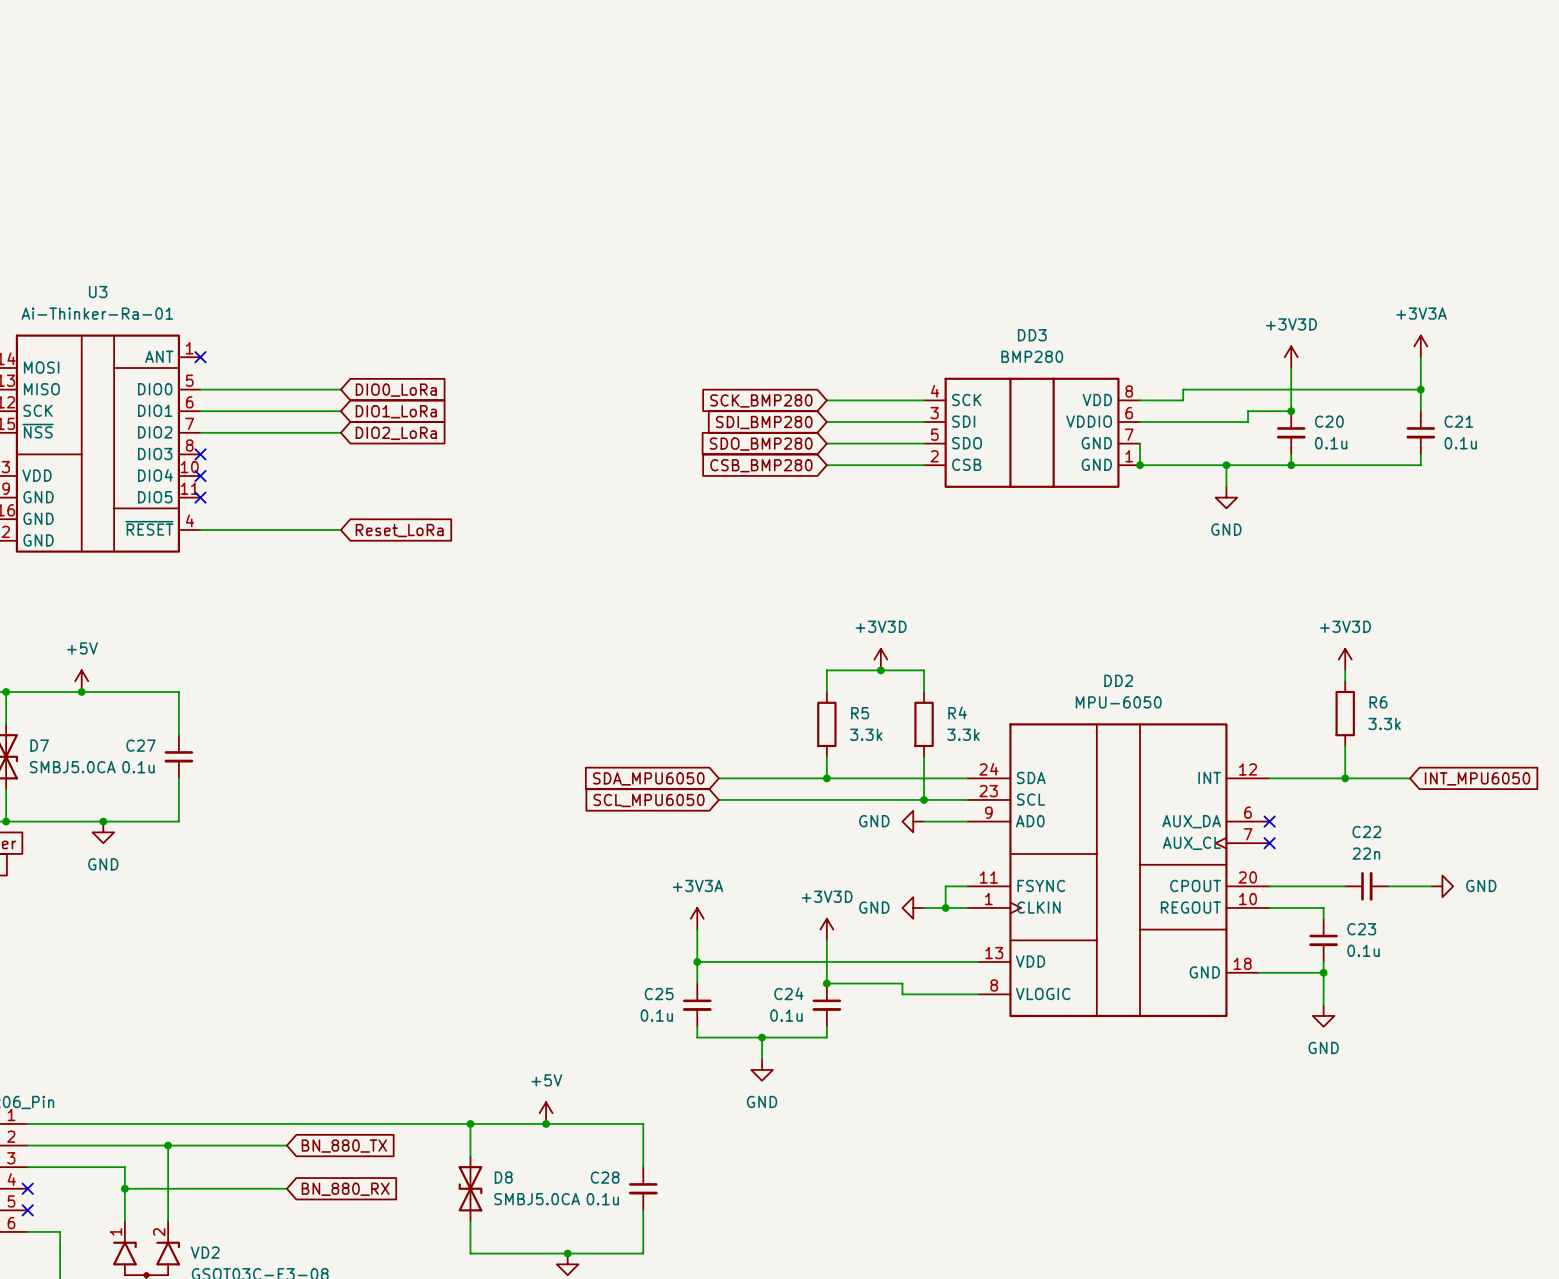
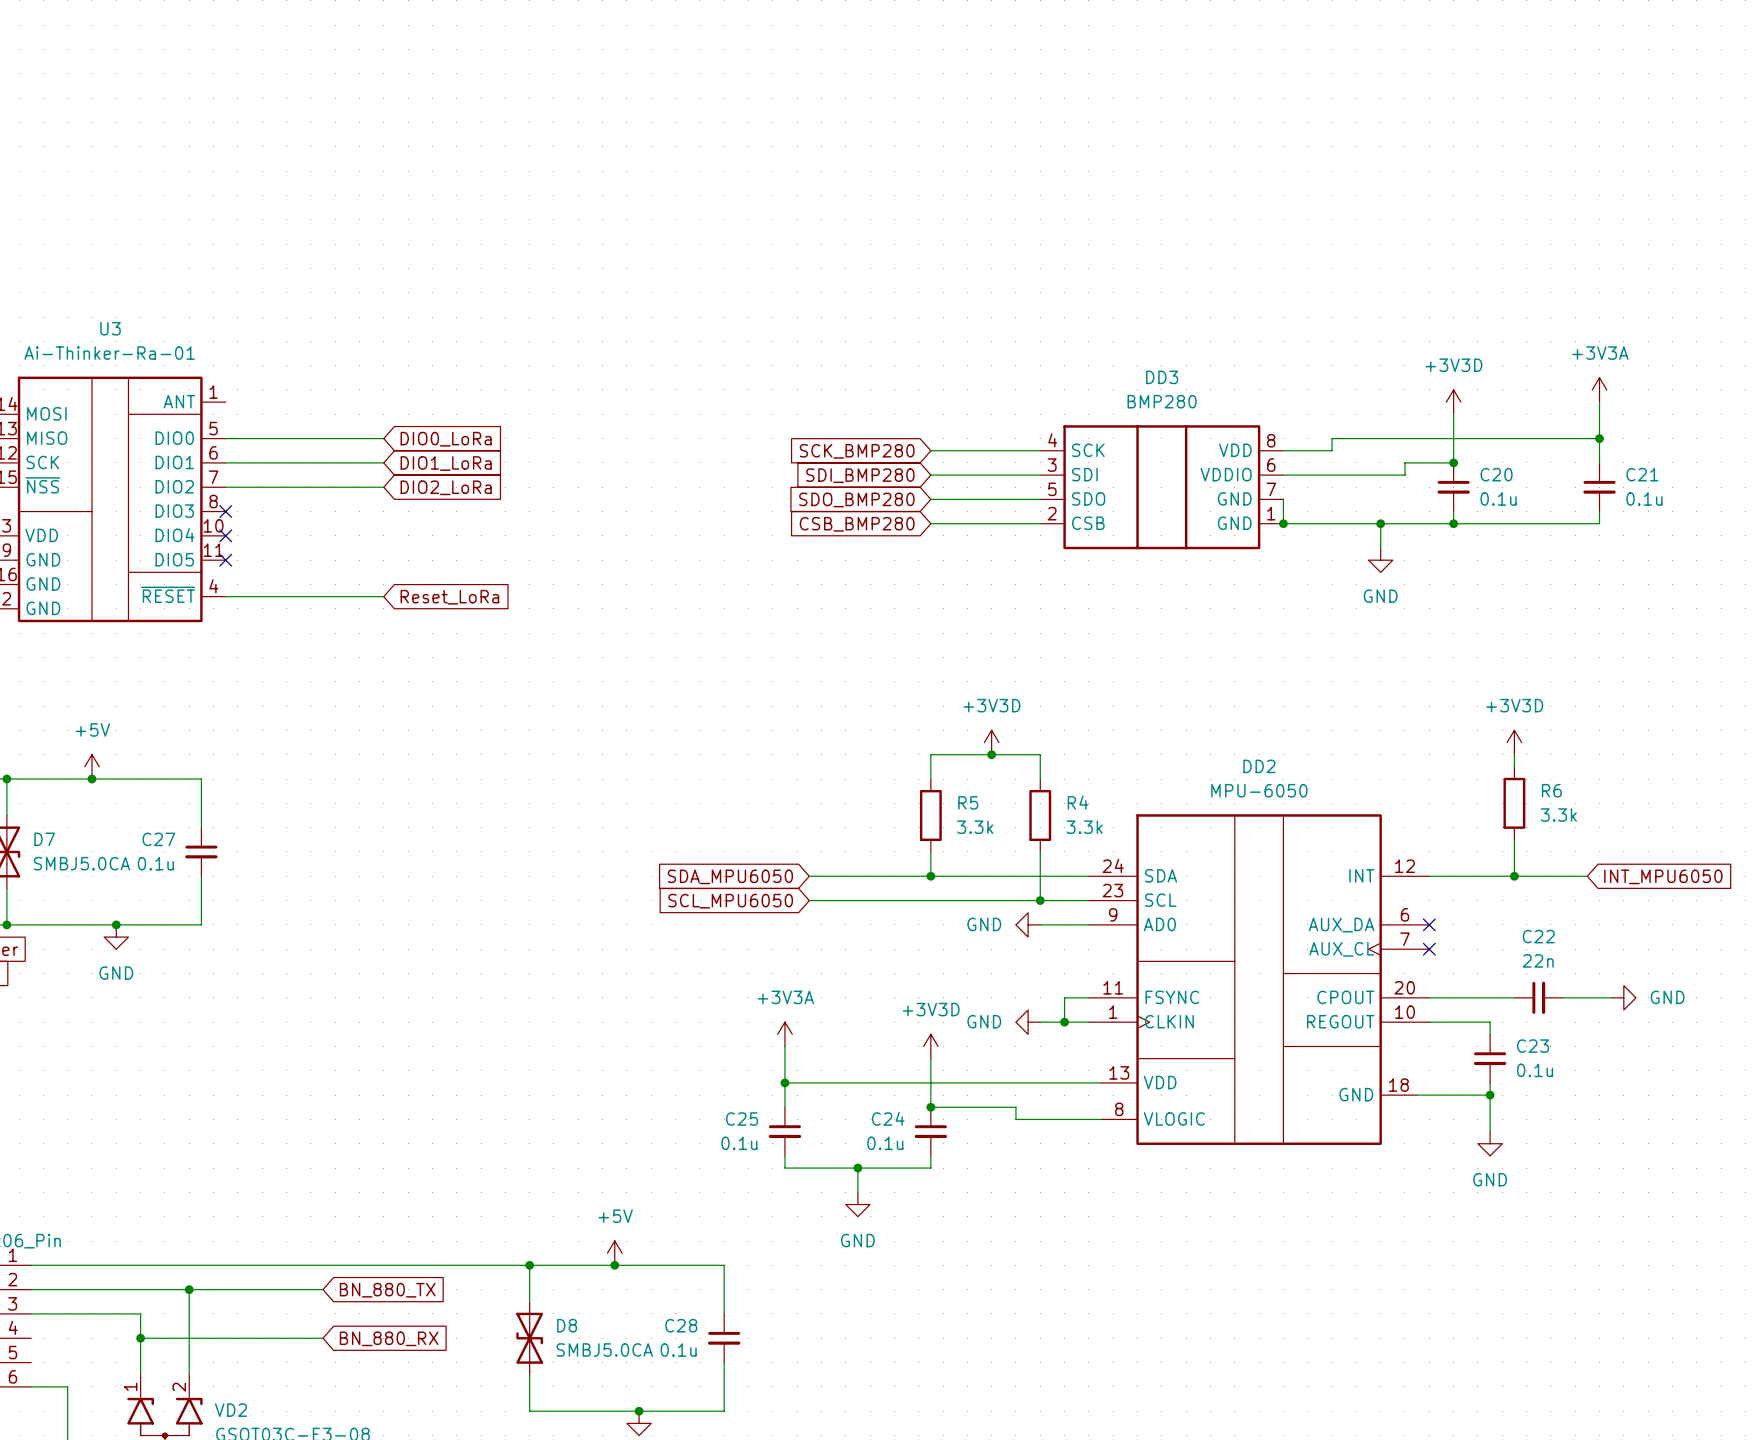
no-connect mark: (200, 357) -> none
no-connect mark: (27, 1188) -> none
no-connect mark: (27, 1210) -> none

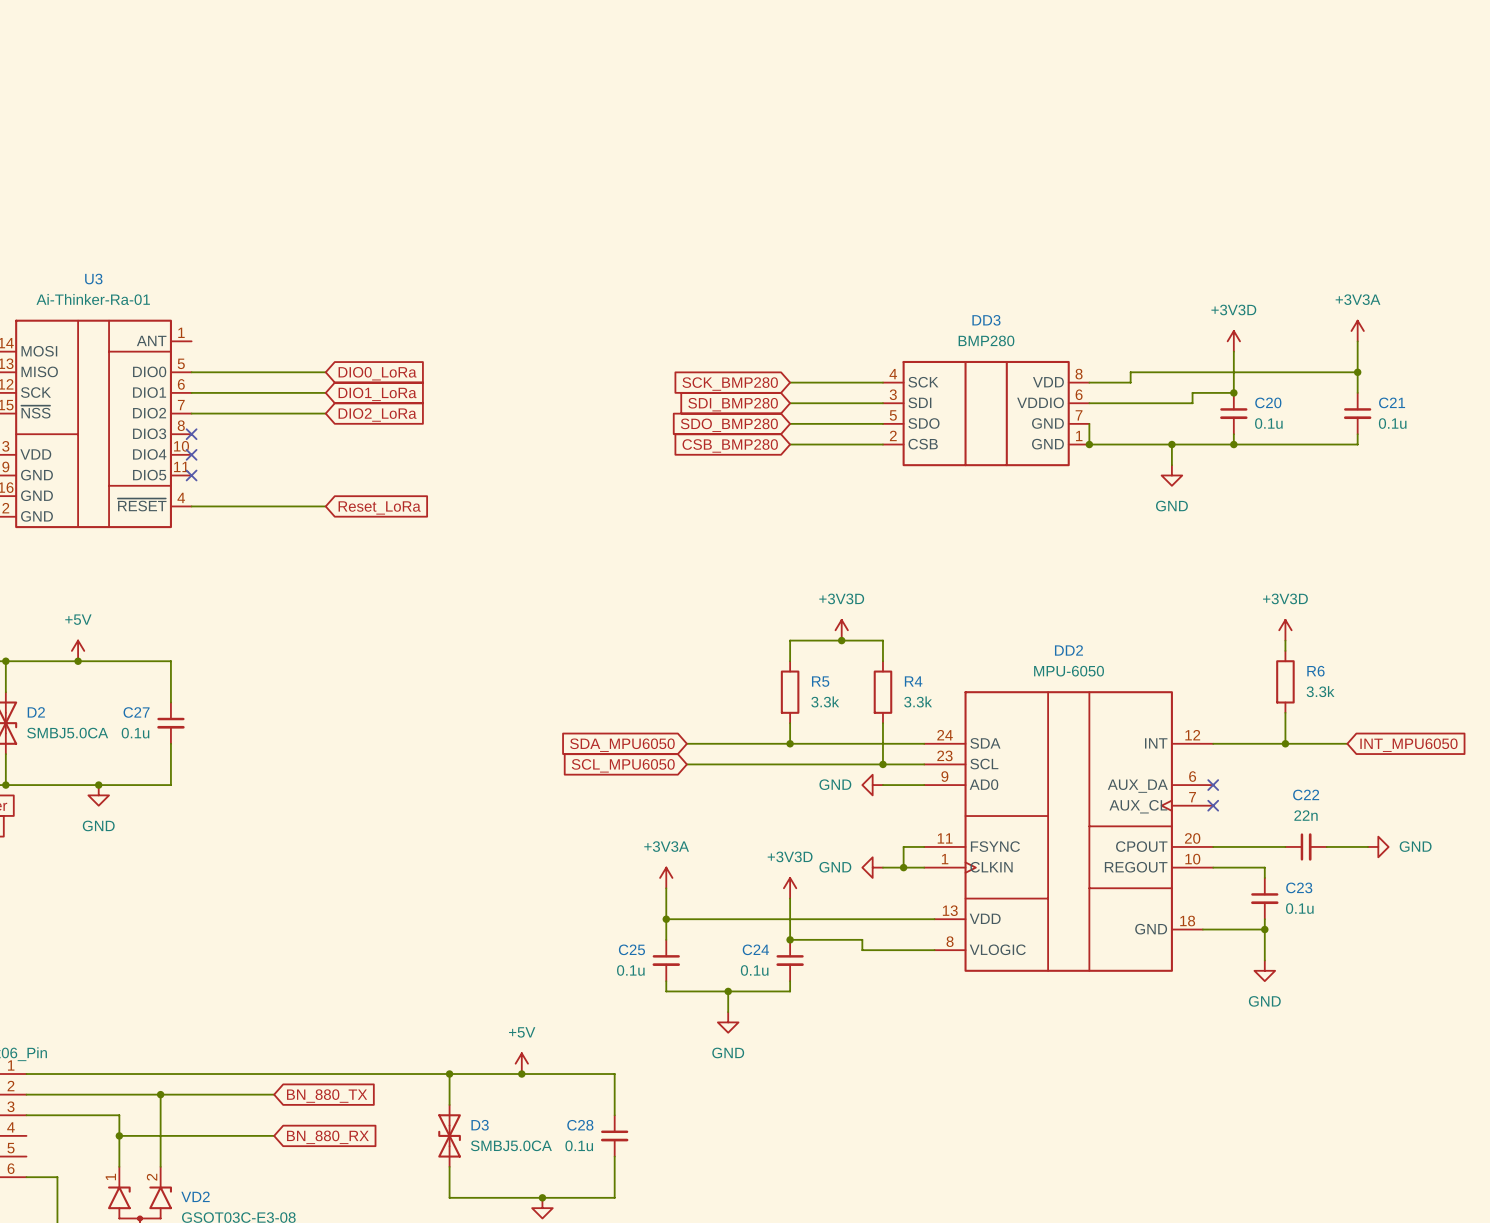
D7 name: D7 (44, 839) -> D2 (36, 712)
D8 name: D8 (567, 1325) -> D3 (480, 1125)

